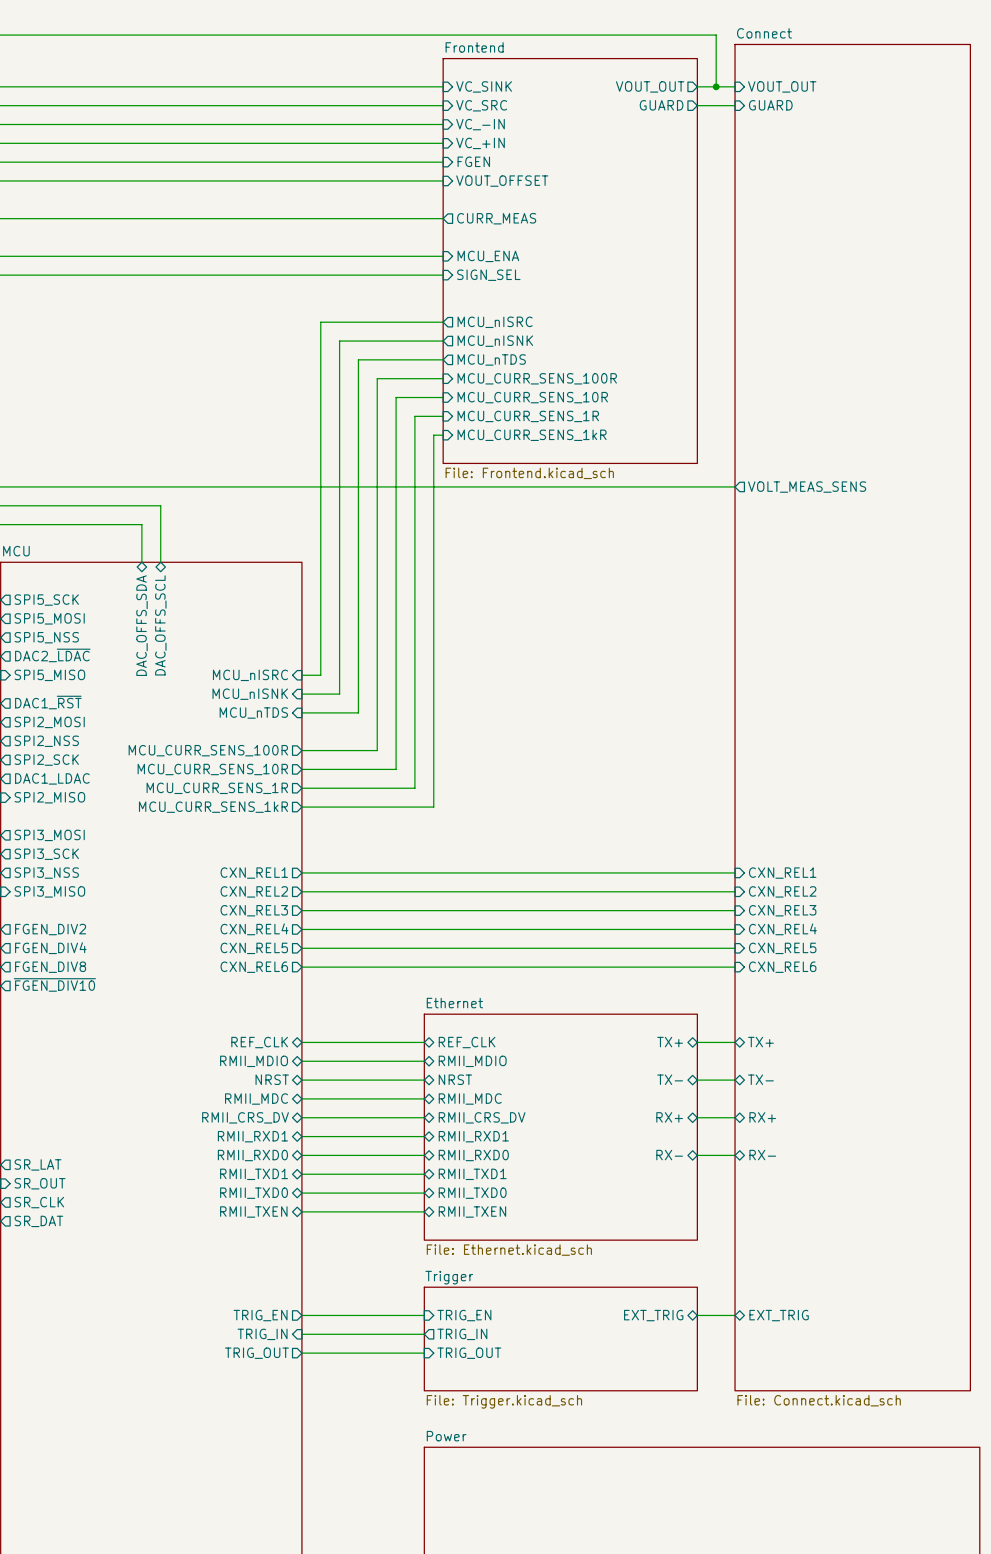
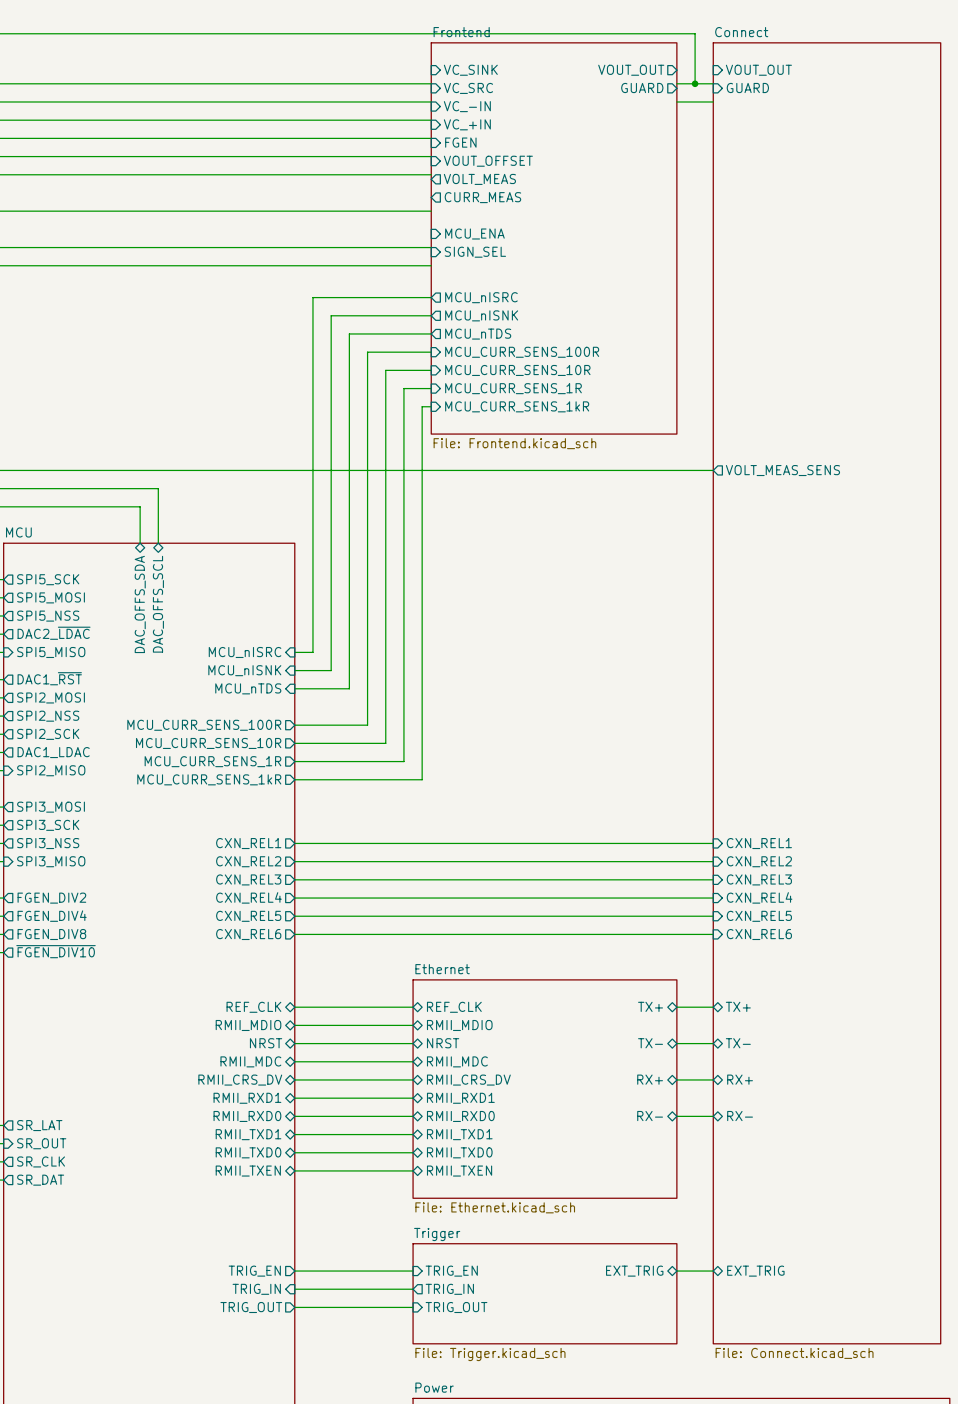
sheet pin position: VC_SINK (484, 86) -> VC_SINK (470, 70)
sheet pin position: VOUT_OUT (650, 86) -> VOUT_OUT (631, 70)
sheet pin position: VOUT_OUT (782, 86) -> VOUT_OUT (758, 70)
sheet pin position: VC_SRC (481, 105) -> VC_SRC (468, 88)
sheet pin position: GUARD (661, 105) -> GUARD (642, 88)
sheet pin position: GUARD (770, 105) -> GUARD (747, 88)
sheet pin position: VC_-IN (480, 124) -> VC_-IN (467, 106)
sheet pin position: VC_+IN (480, 143) -> VC_+IN (467, 124)
sheet pin position: FGEN (473, 161) -> FGEN (460, 142)
sheet pin position: VOUT_OFFSET (502, 181) -> VOUT_OFFSET (488, 161)
sheet pin: none -> VOLT_MEAS (479, 179)
sheet pin position: CURR_MEAS (496, 218) -> CURR_MEAS (482, 197)
sheet pin position: MCU_ENA (488, 256) -> MCU_ENA (474, 234)
sheet Frontend position: (570, 261) -> (554, 238)
sheet pin position: SIGN_SEL (488, 275) -> SIGN_SEL (475, 252)
wire: (320, 322) (443, 322) -> (312, 311) (312, 297) (431, 297)
sheet pin position: MCU_nISRC (495, 322) -> MCU_nISRC (481, 297)
wire: (339, 341) (443, 341) -> (331, 329) (331, 315) (431, 315)
sheet pin position: MCU_nISNK (495, 341) -> MCU_nISNK (481, 315)
wire: (358, 359) (443, 359) -> (349, 347) (349, 333) (431, 333)
sheet pin position: MCU_nTDS (491, 359) -> MCU_nTDS (478, 334)
wire: (377, 378) (443, 378) -> (367, 365) (367, 352) (431, 352)
sheet pin position: MCU_CURR_SENS_100R (537, 378) -> MCU_CURR_SENS_100R (522, 352)
wire: (396, 397) (443, 397) -> (385, 384) (385, 370) (431, 370)
sheet pin position: MCU_CURR_SENS_10R (532, 397) -> MCU_CURR_SENS_10R (517, 370)
wire: (414, 416) (443, 416) -> (403, 402) (403, 388) (431, 388)
sheet pin position: MCU_CURR_SENS_1R (528, 416) -> MCU_CURR_SENS_1R (513, 388)
wire: (433, 435) (443, 435) -> (422, 420) (422, 406) (431, 406)
sheet pin position: MCU_CURR_SENS_1kR (532, 435) -> MCU_CURR_SENS_1kR (517, 406)

